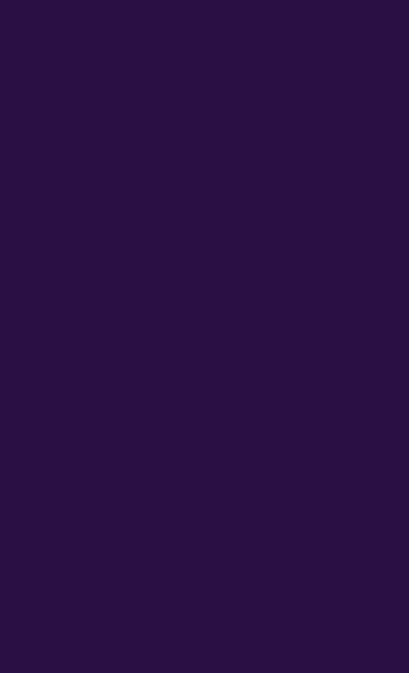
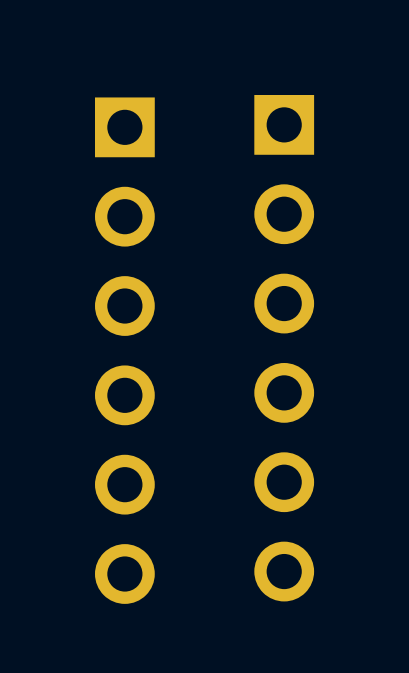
part: none -> (284, 348)
part: none -> (124, 350)

